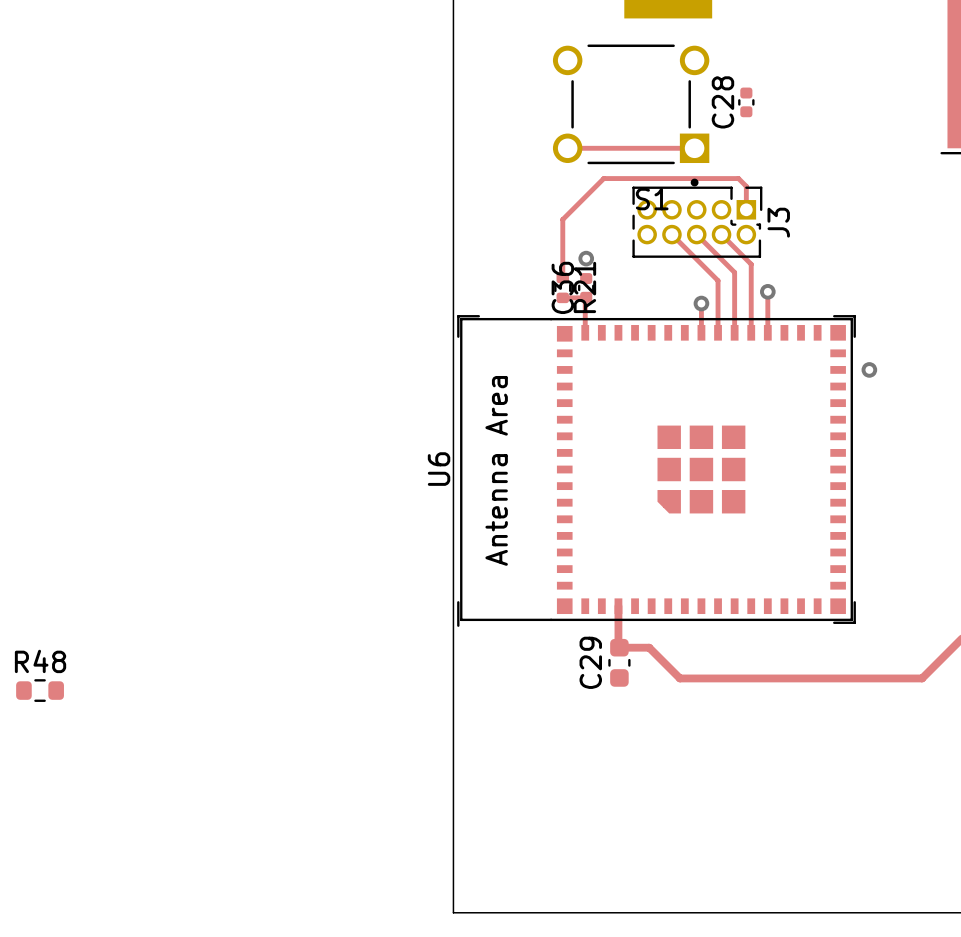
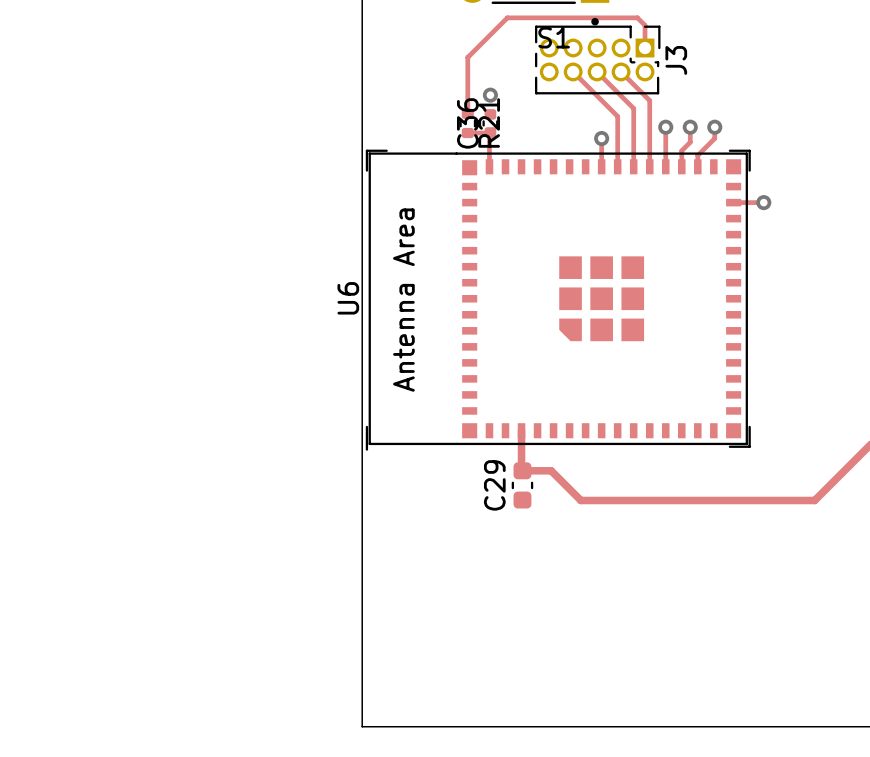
top track: none -> (690, 127) (690, 142) (681, 150) (681, 166)
via: none -> (690, 127)
top track: none -> (714, 127) (714, 138) (697, 155) (697, 166)
via: none -> (714, 127)
top track: none -> (733, 202) (763, 202)

